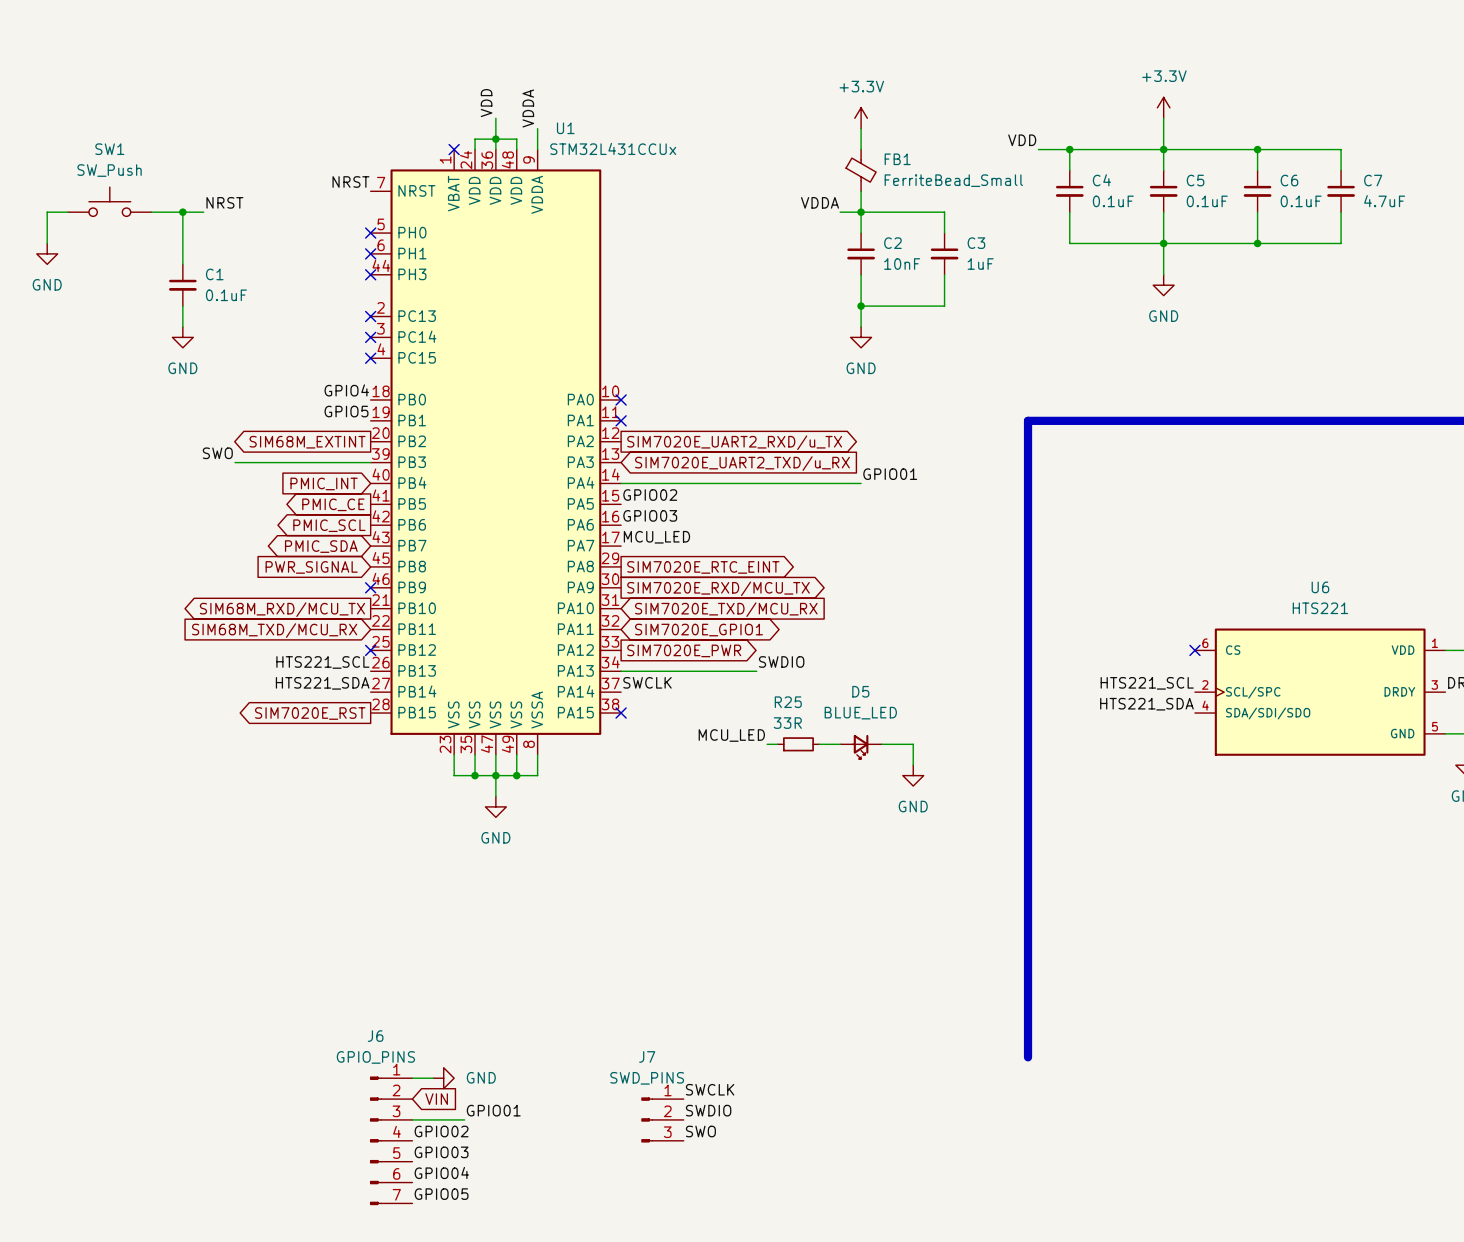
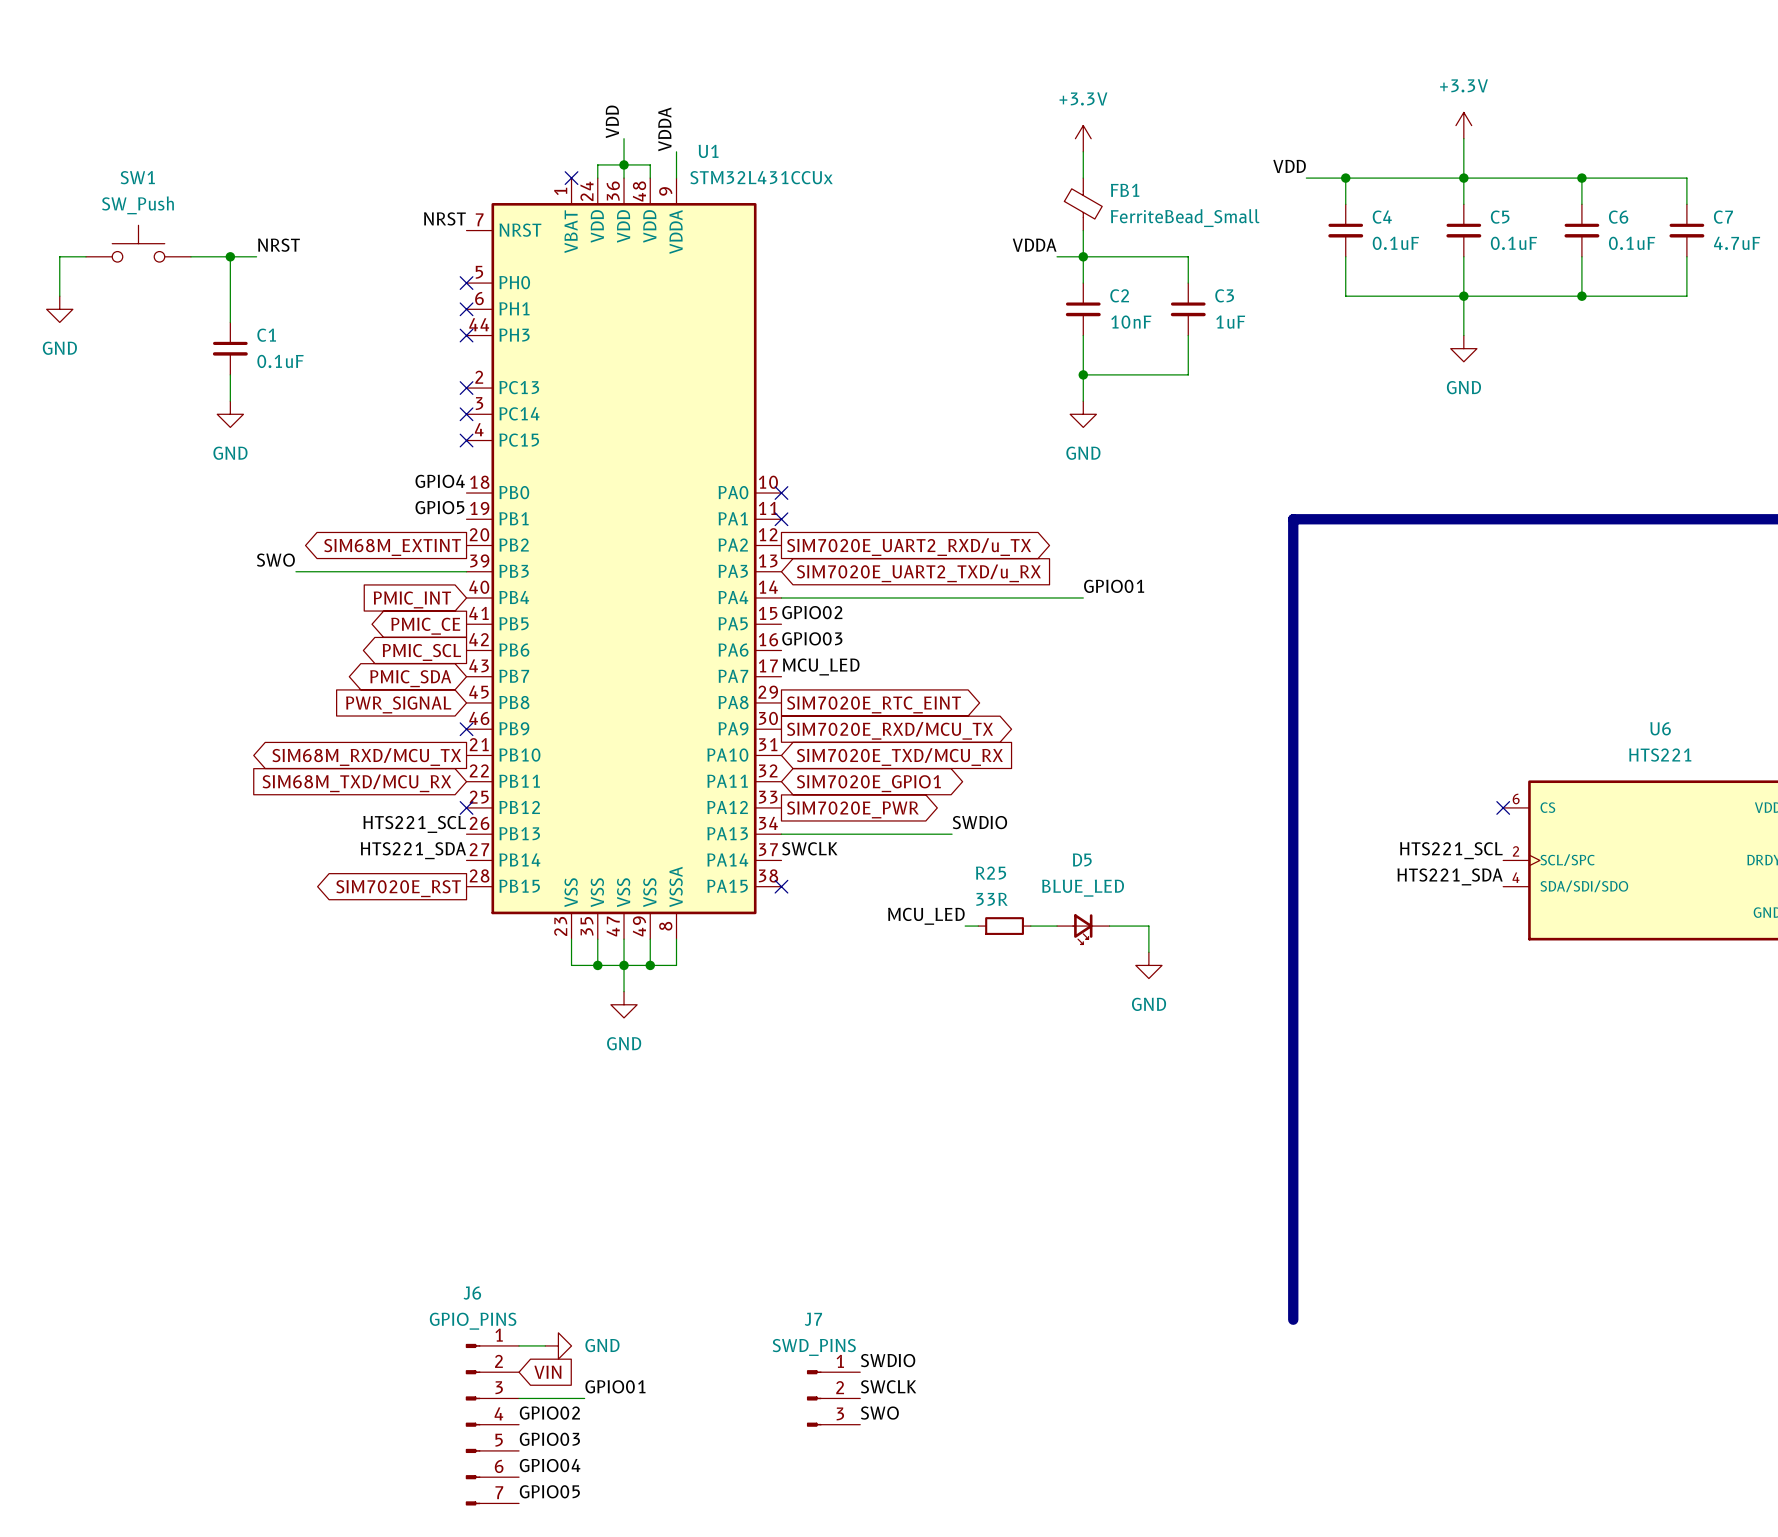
label: SWCLK (710, 1089) -> SWDIO (888, 1360)
label: SWDIO (708, 1110) -> SWCLK (888, 1386)

